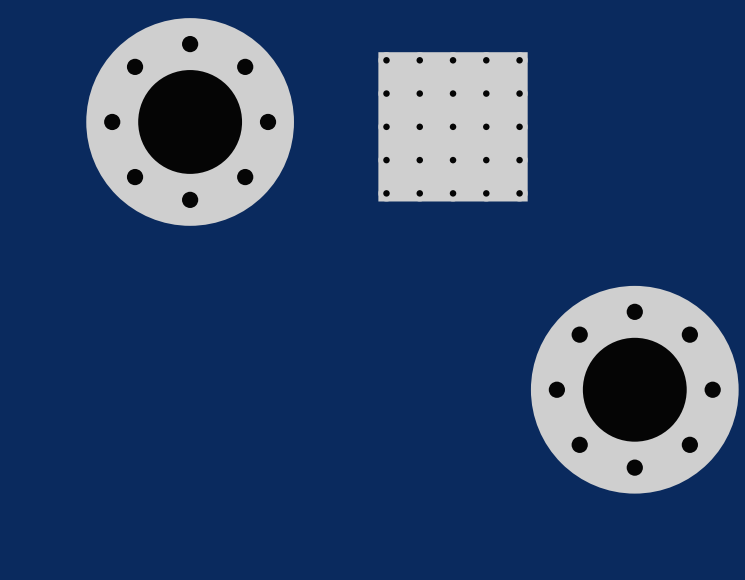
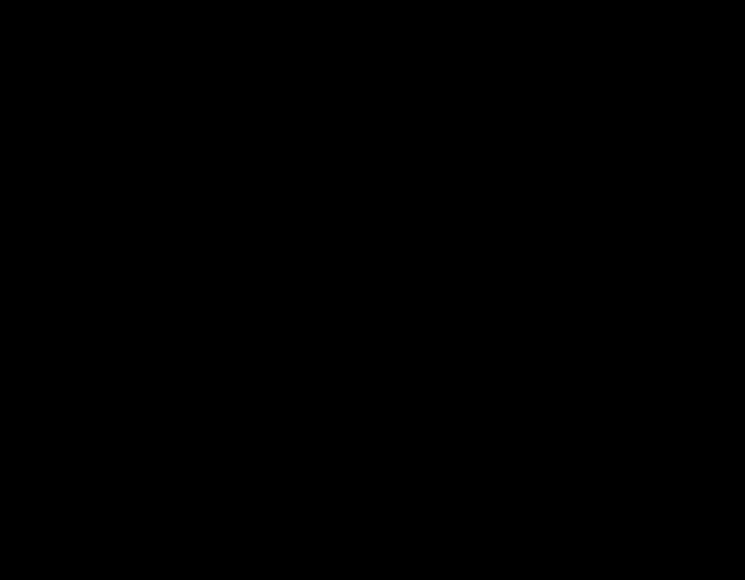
part: (190, 121) -> none
part: (453, 126) -> none
part: (634, 389) -> none

